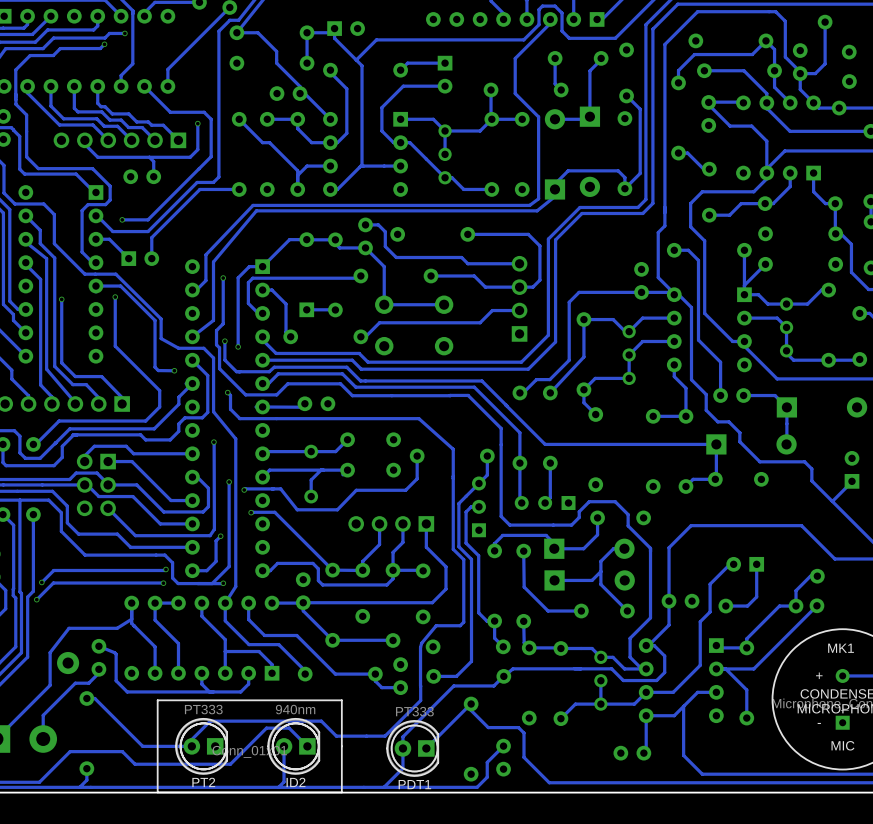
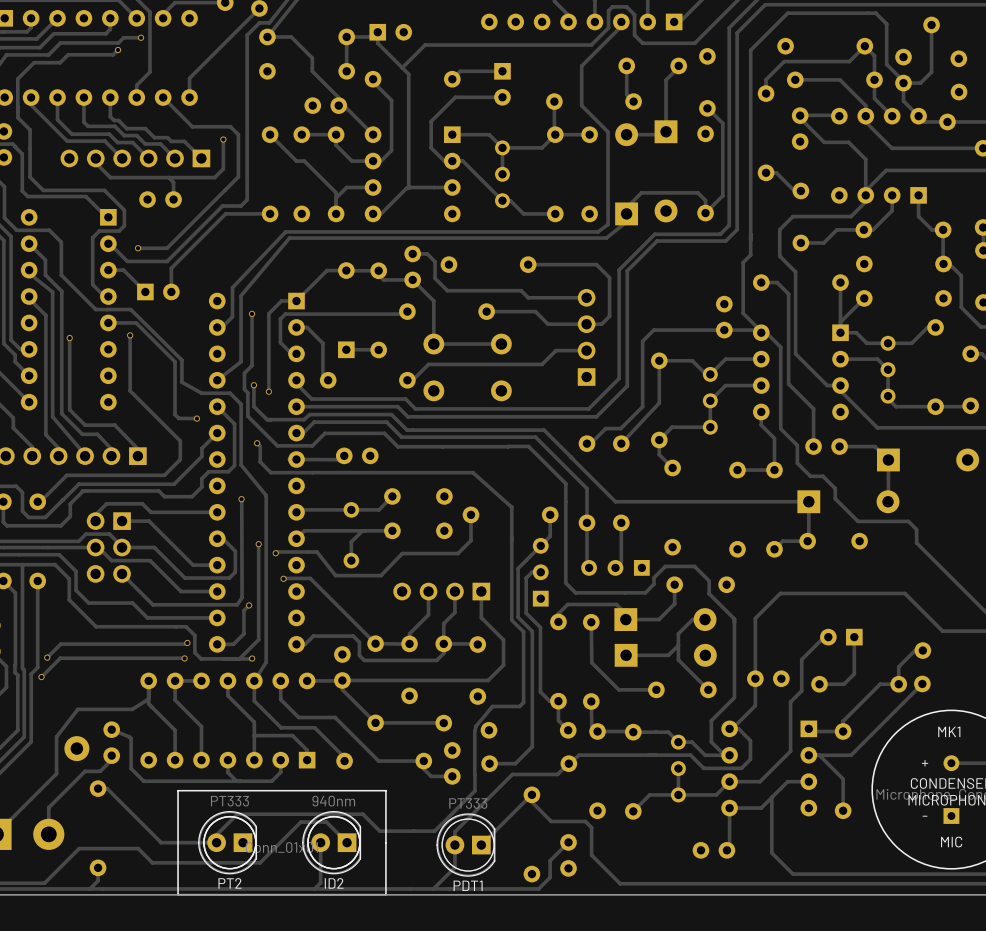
part: (852, 469) -> none
track: (852, 481) (832, 501) -> none

